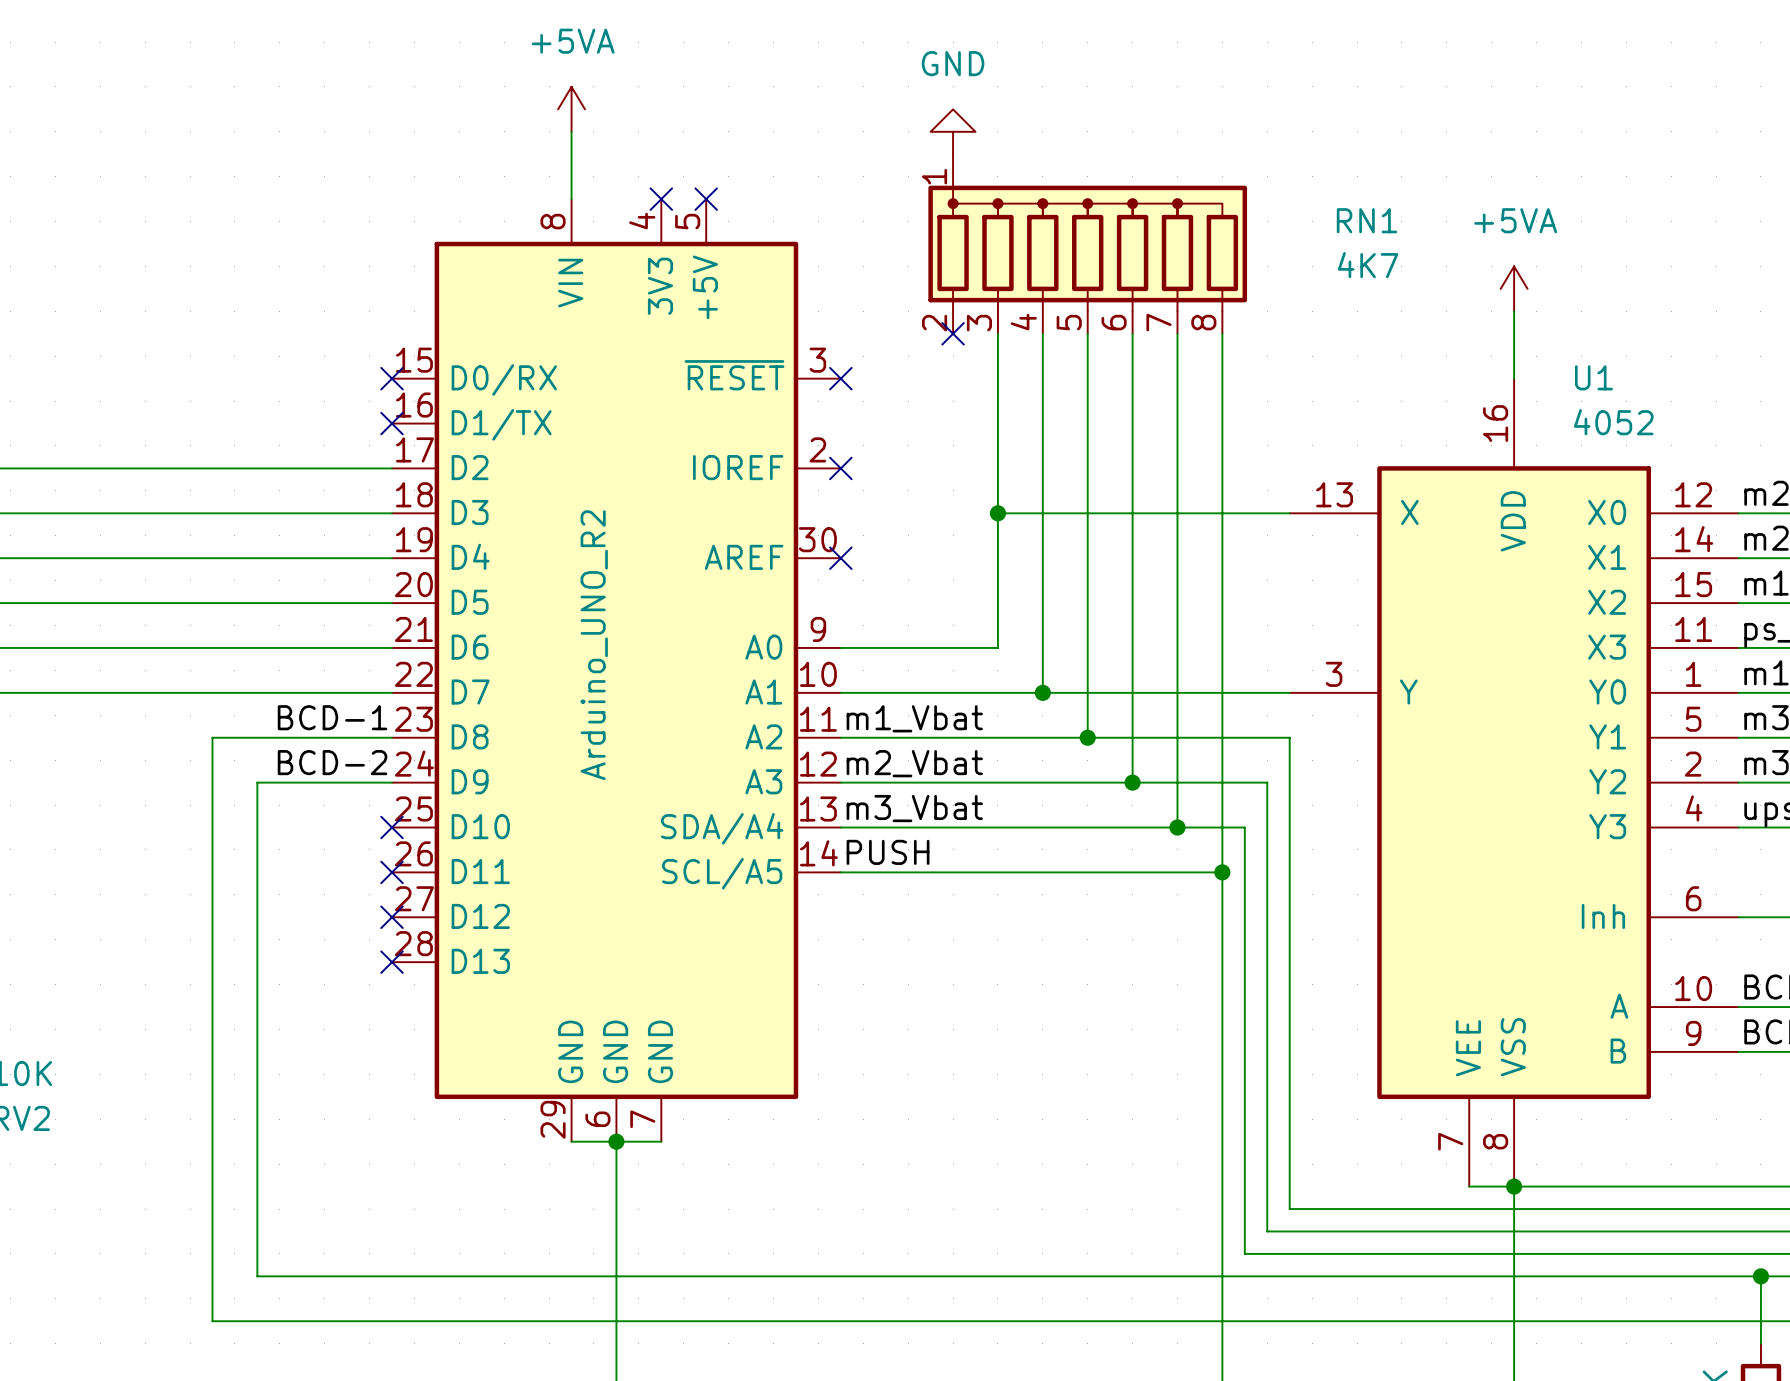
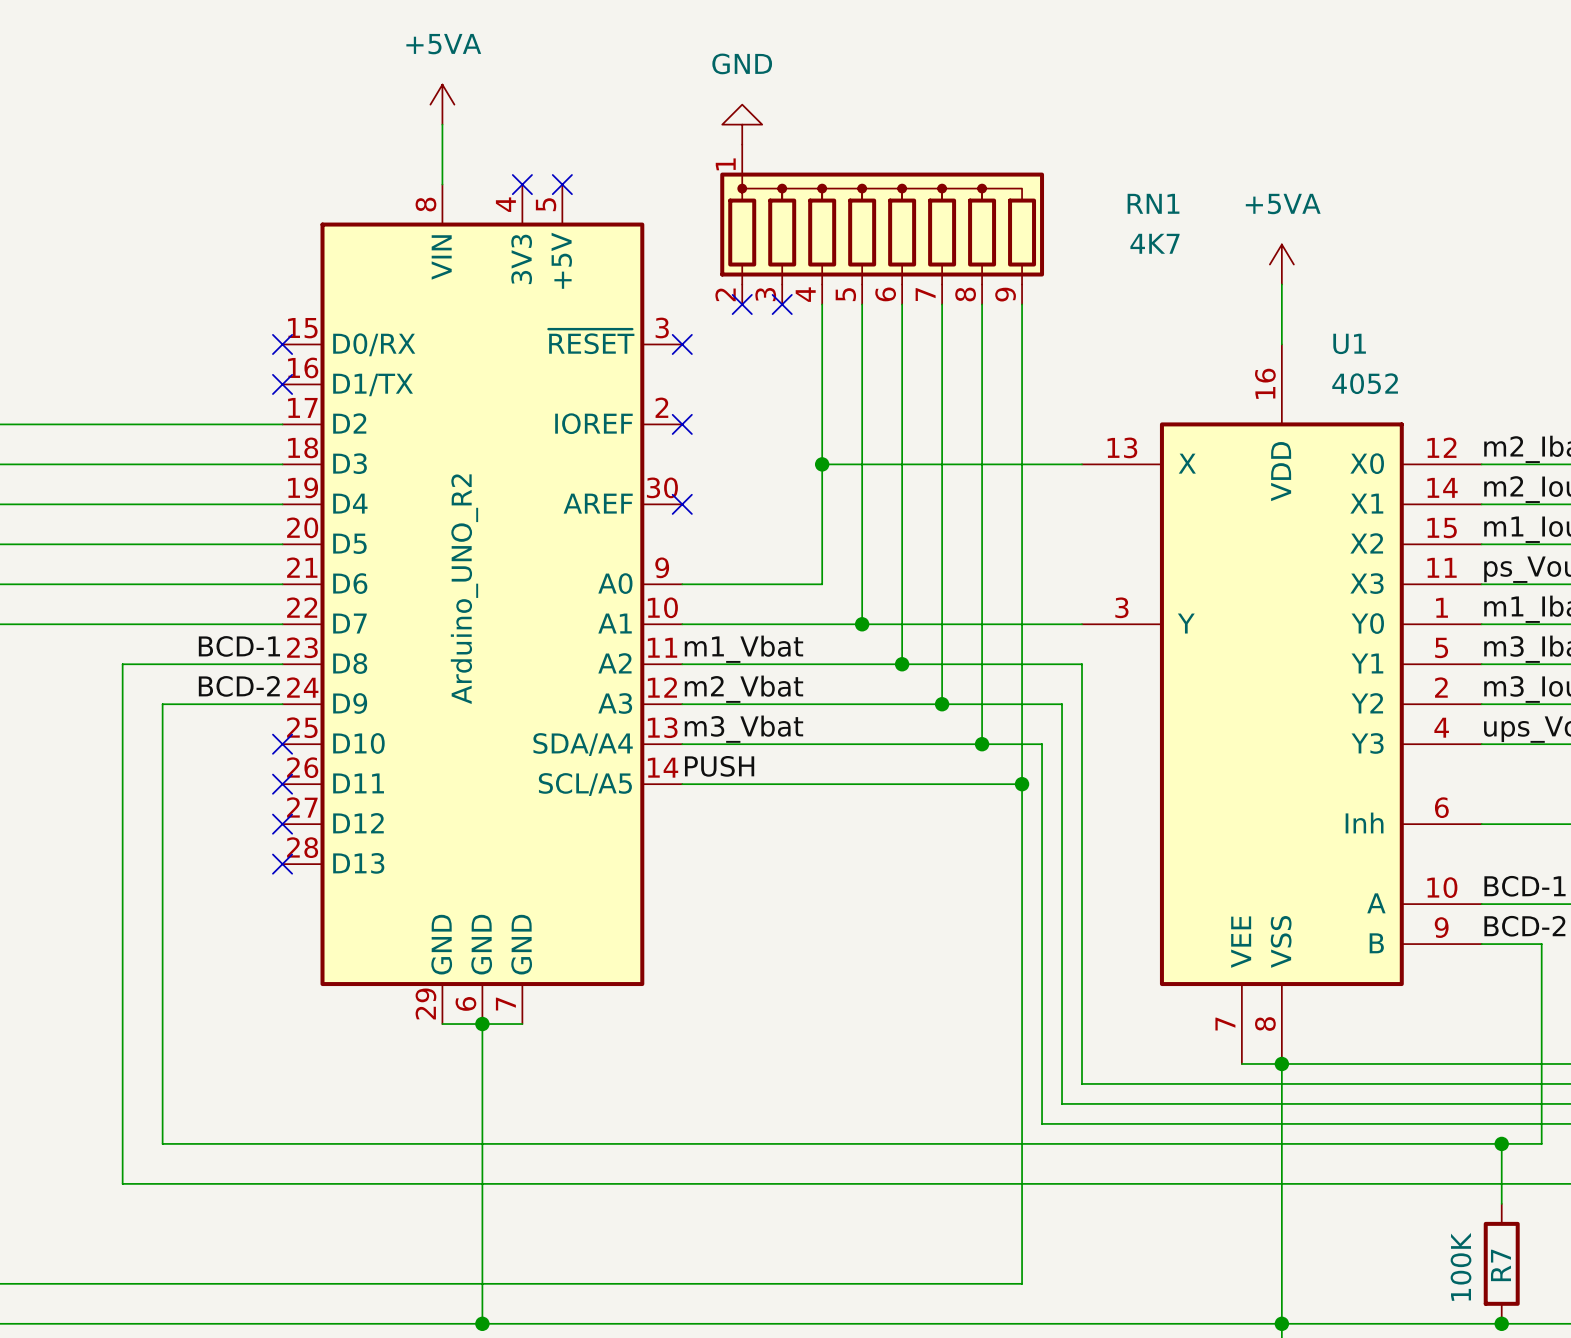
power symbol position: GND (953, 131) -> GND (742, 124)
RN1 symbol: [928, 154, 1248, 334] -> [720, 144, 1045, 305]
no-connect mark: none -> (742, 304)

